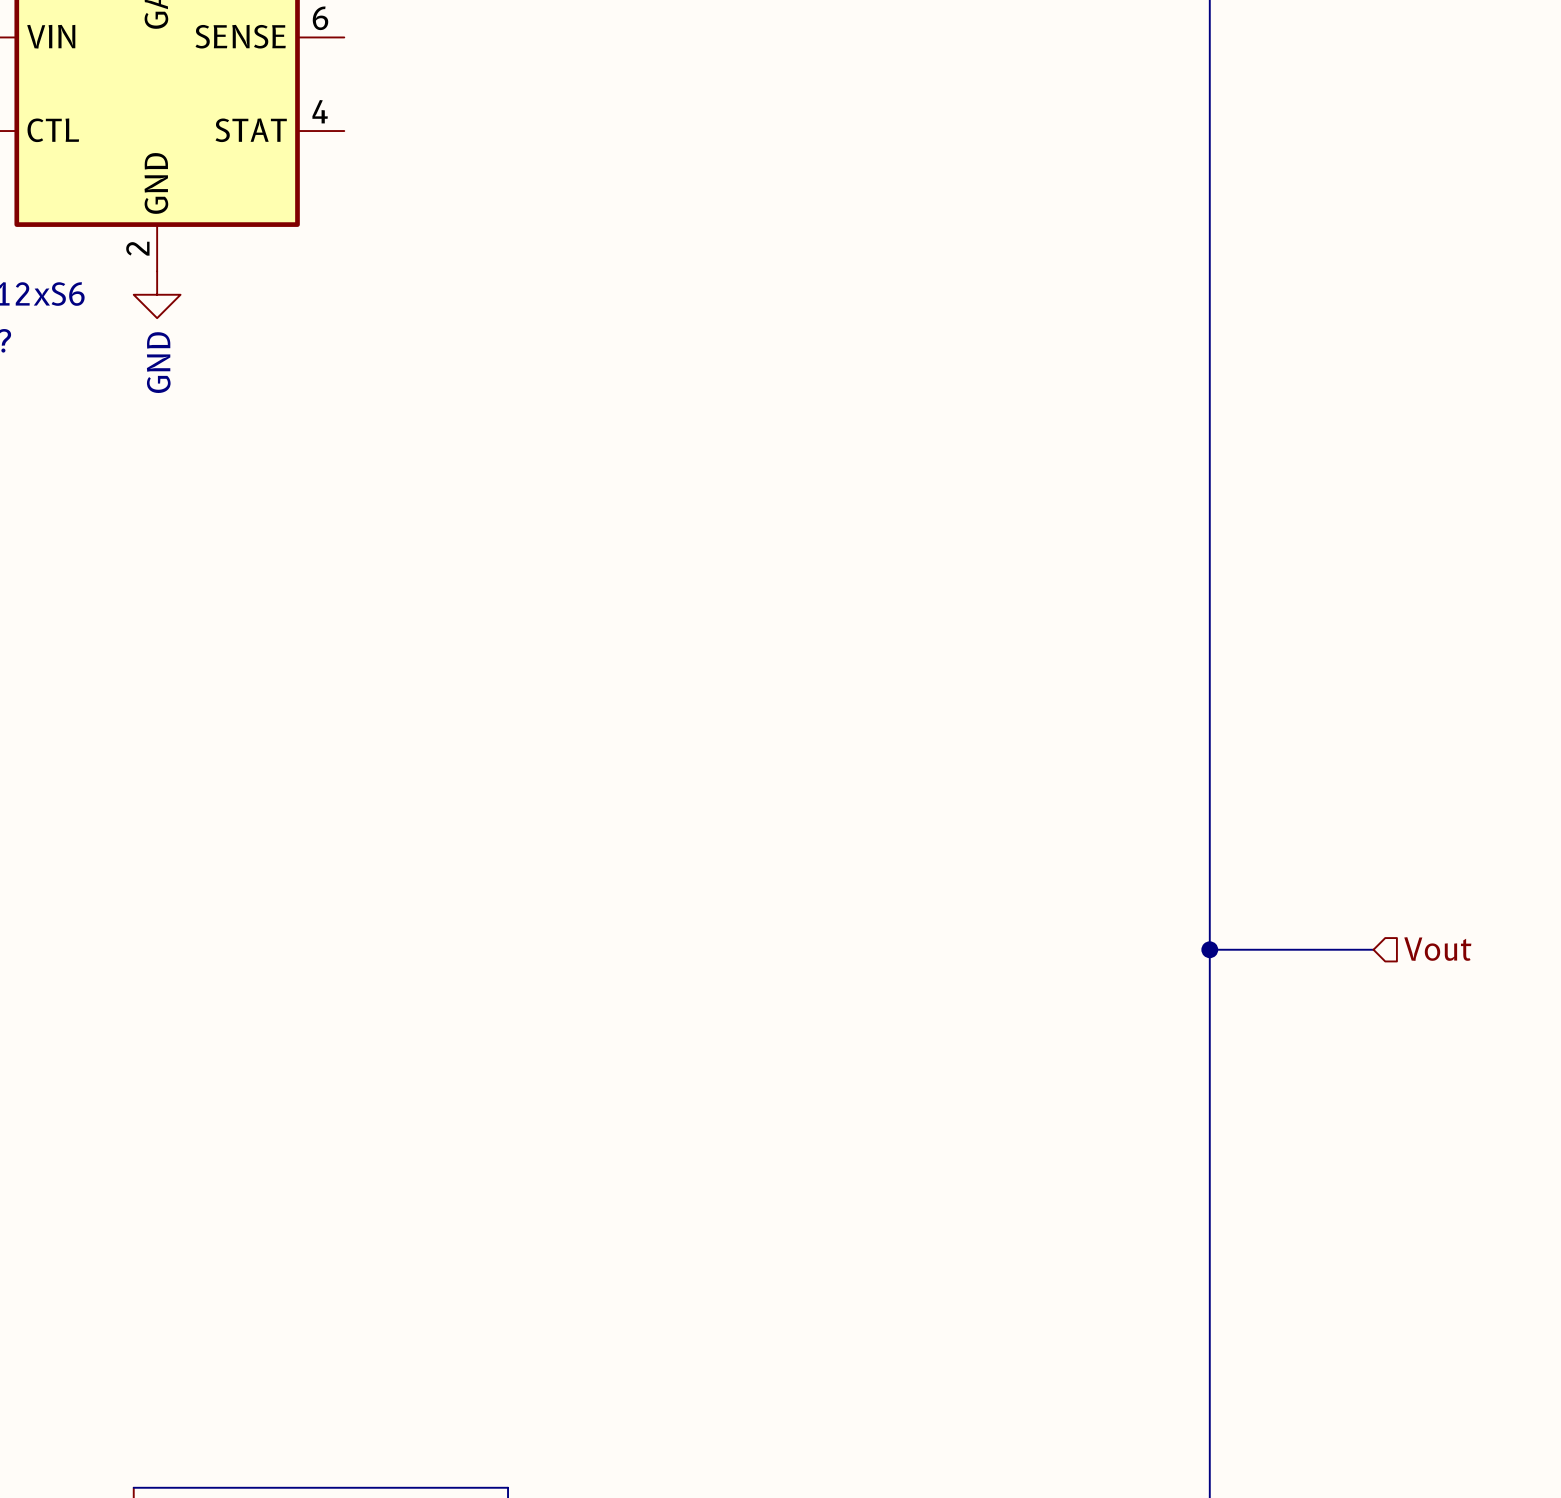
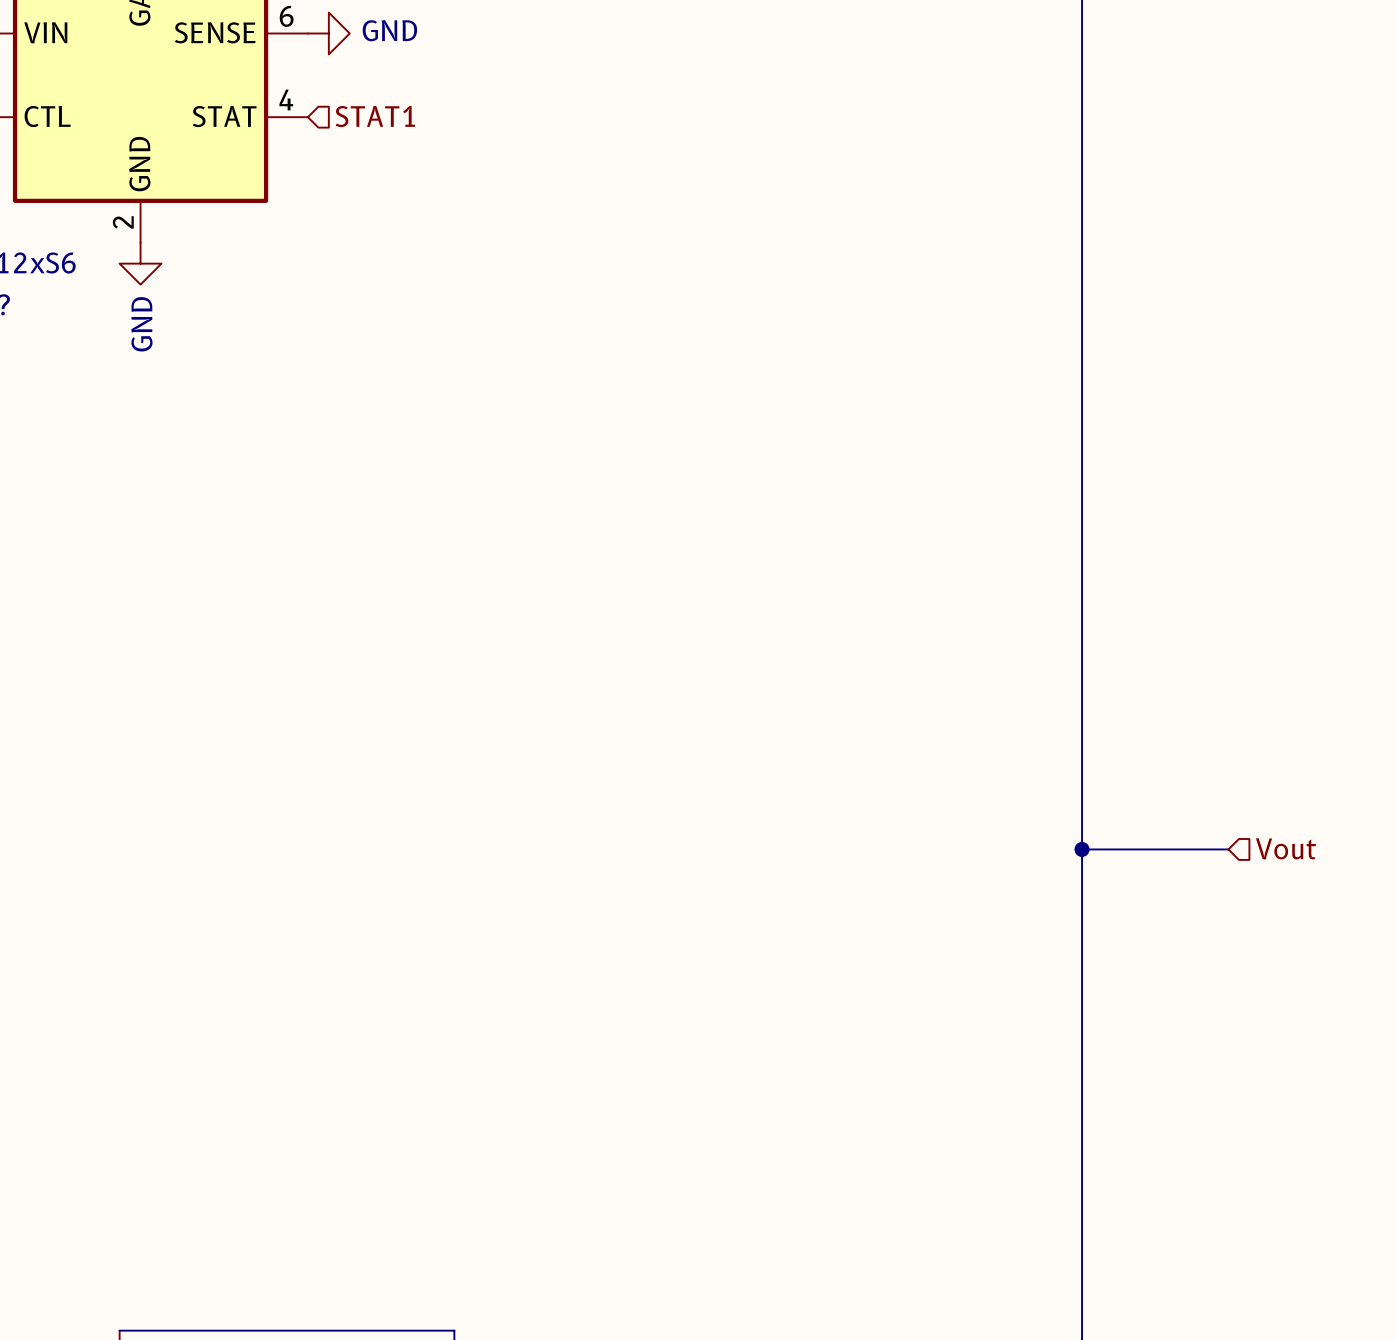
power symbol: none -> GND (328, 33)
hierarchical label: none -> STAT1 (375, 116)

